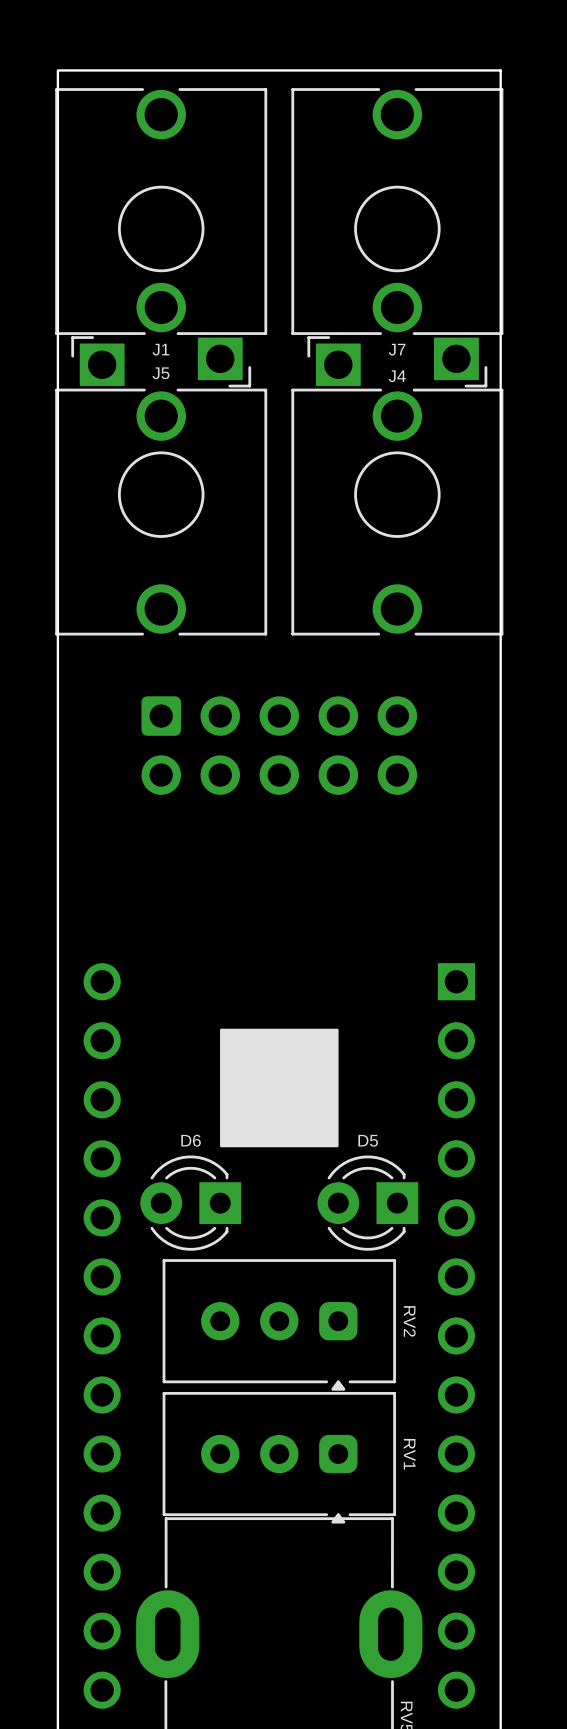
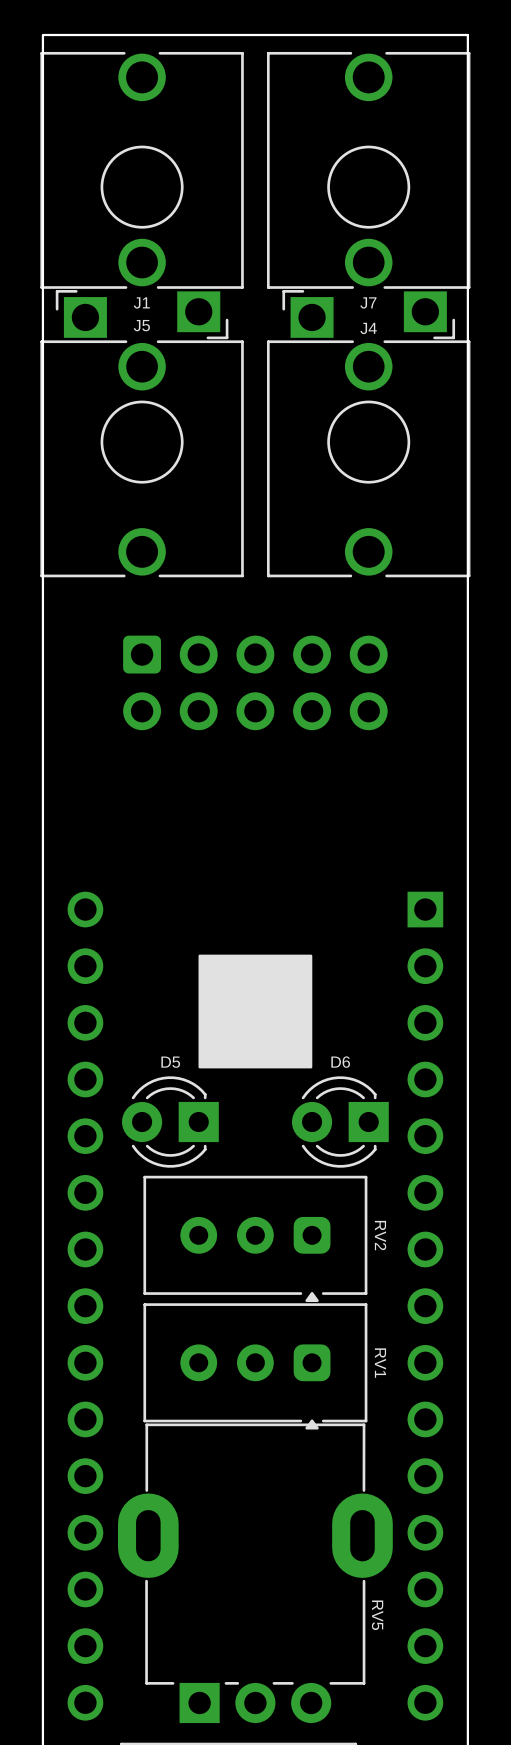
D6 name: D6 (191, 1140) -> D5 (170, 1062)
D5 name: D5 (368, 1140) -> D6 (340, 1062)

